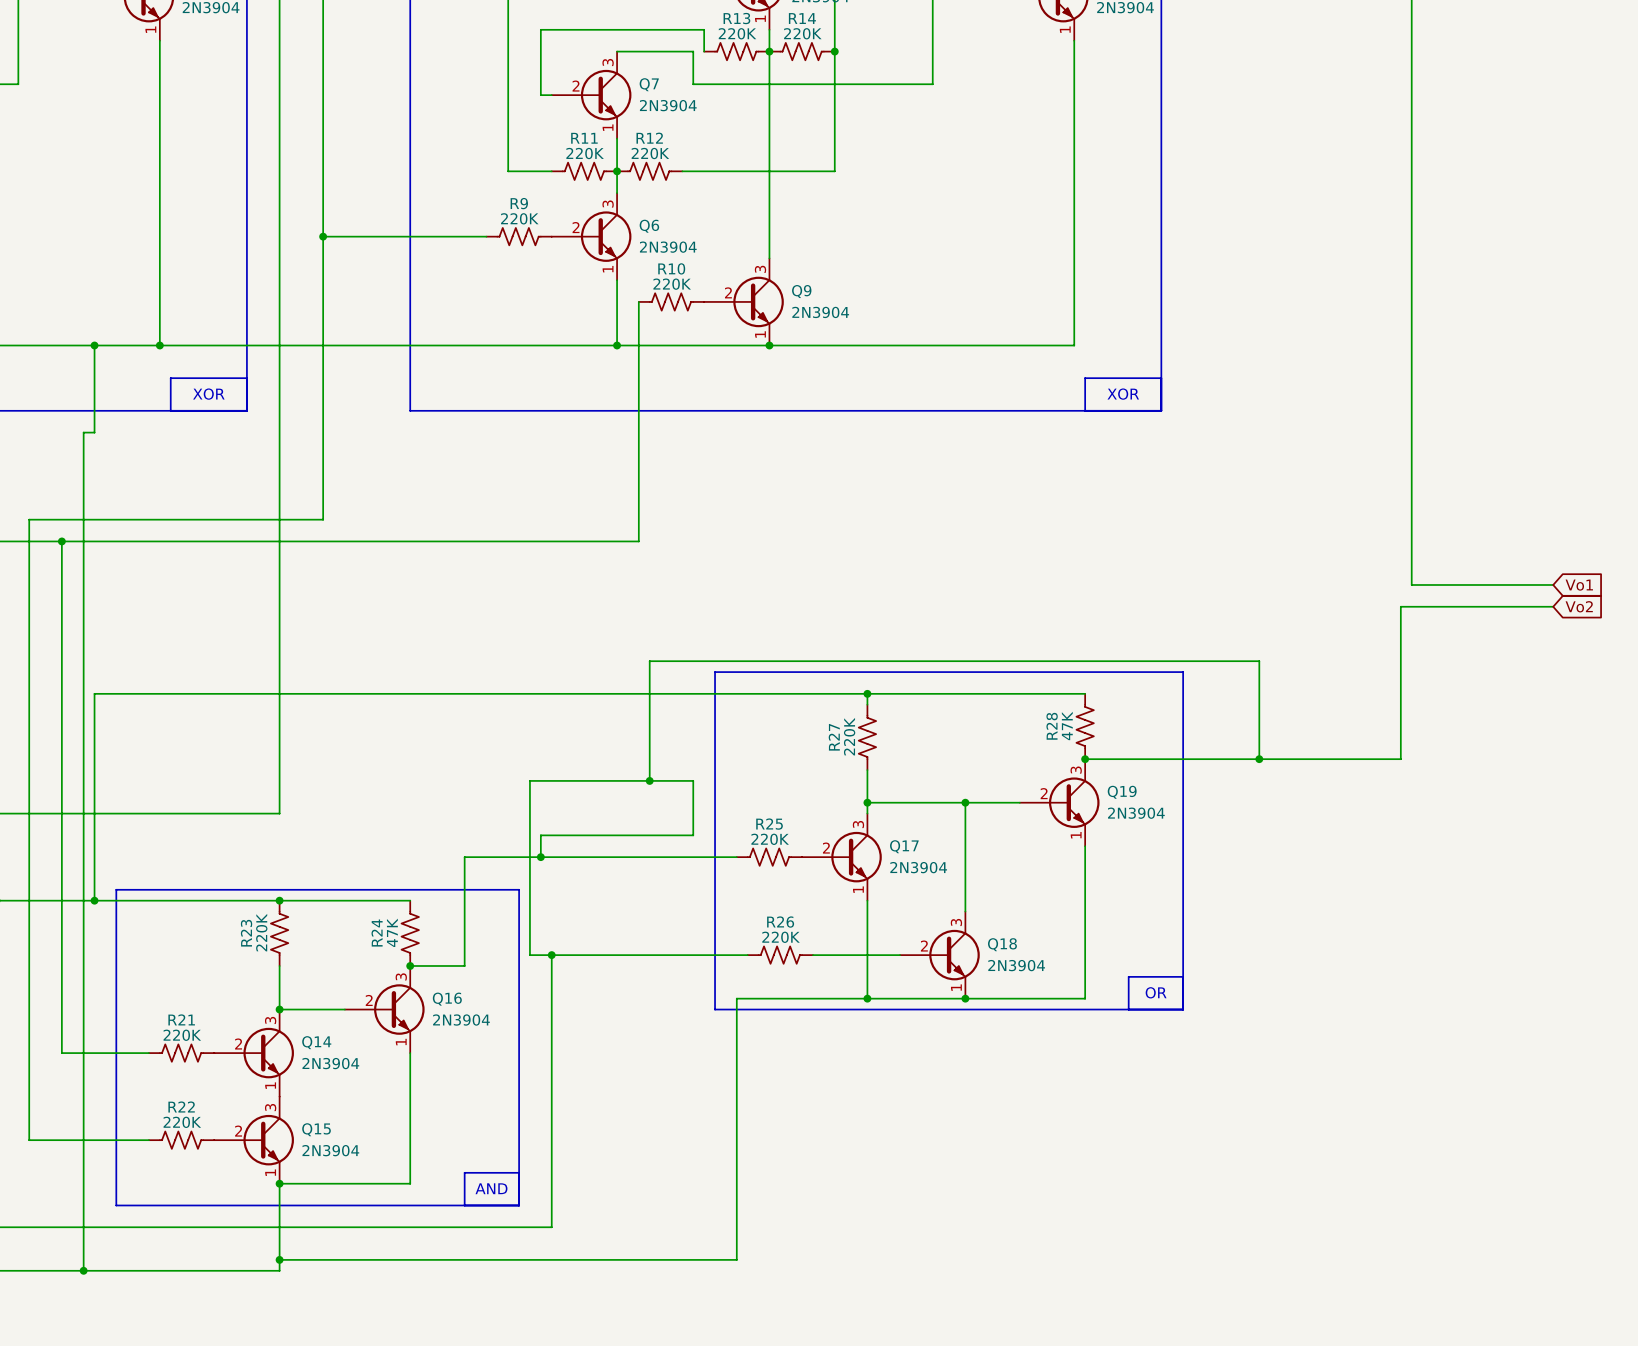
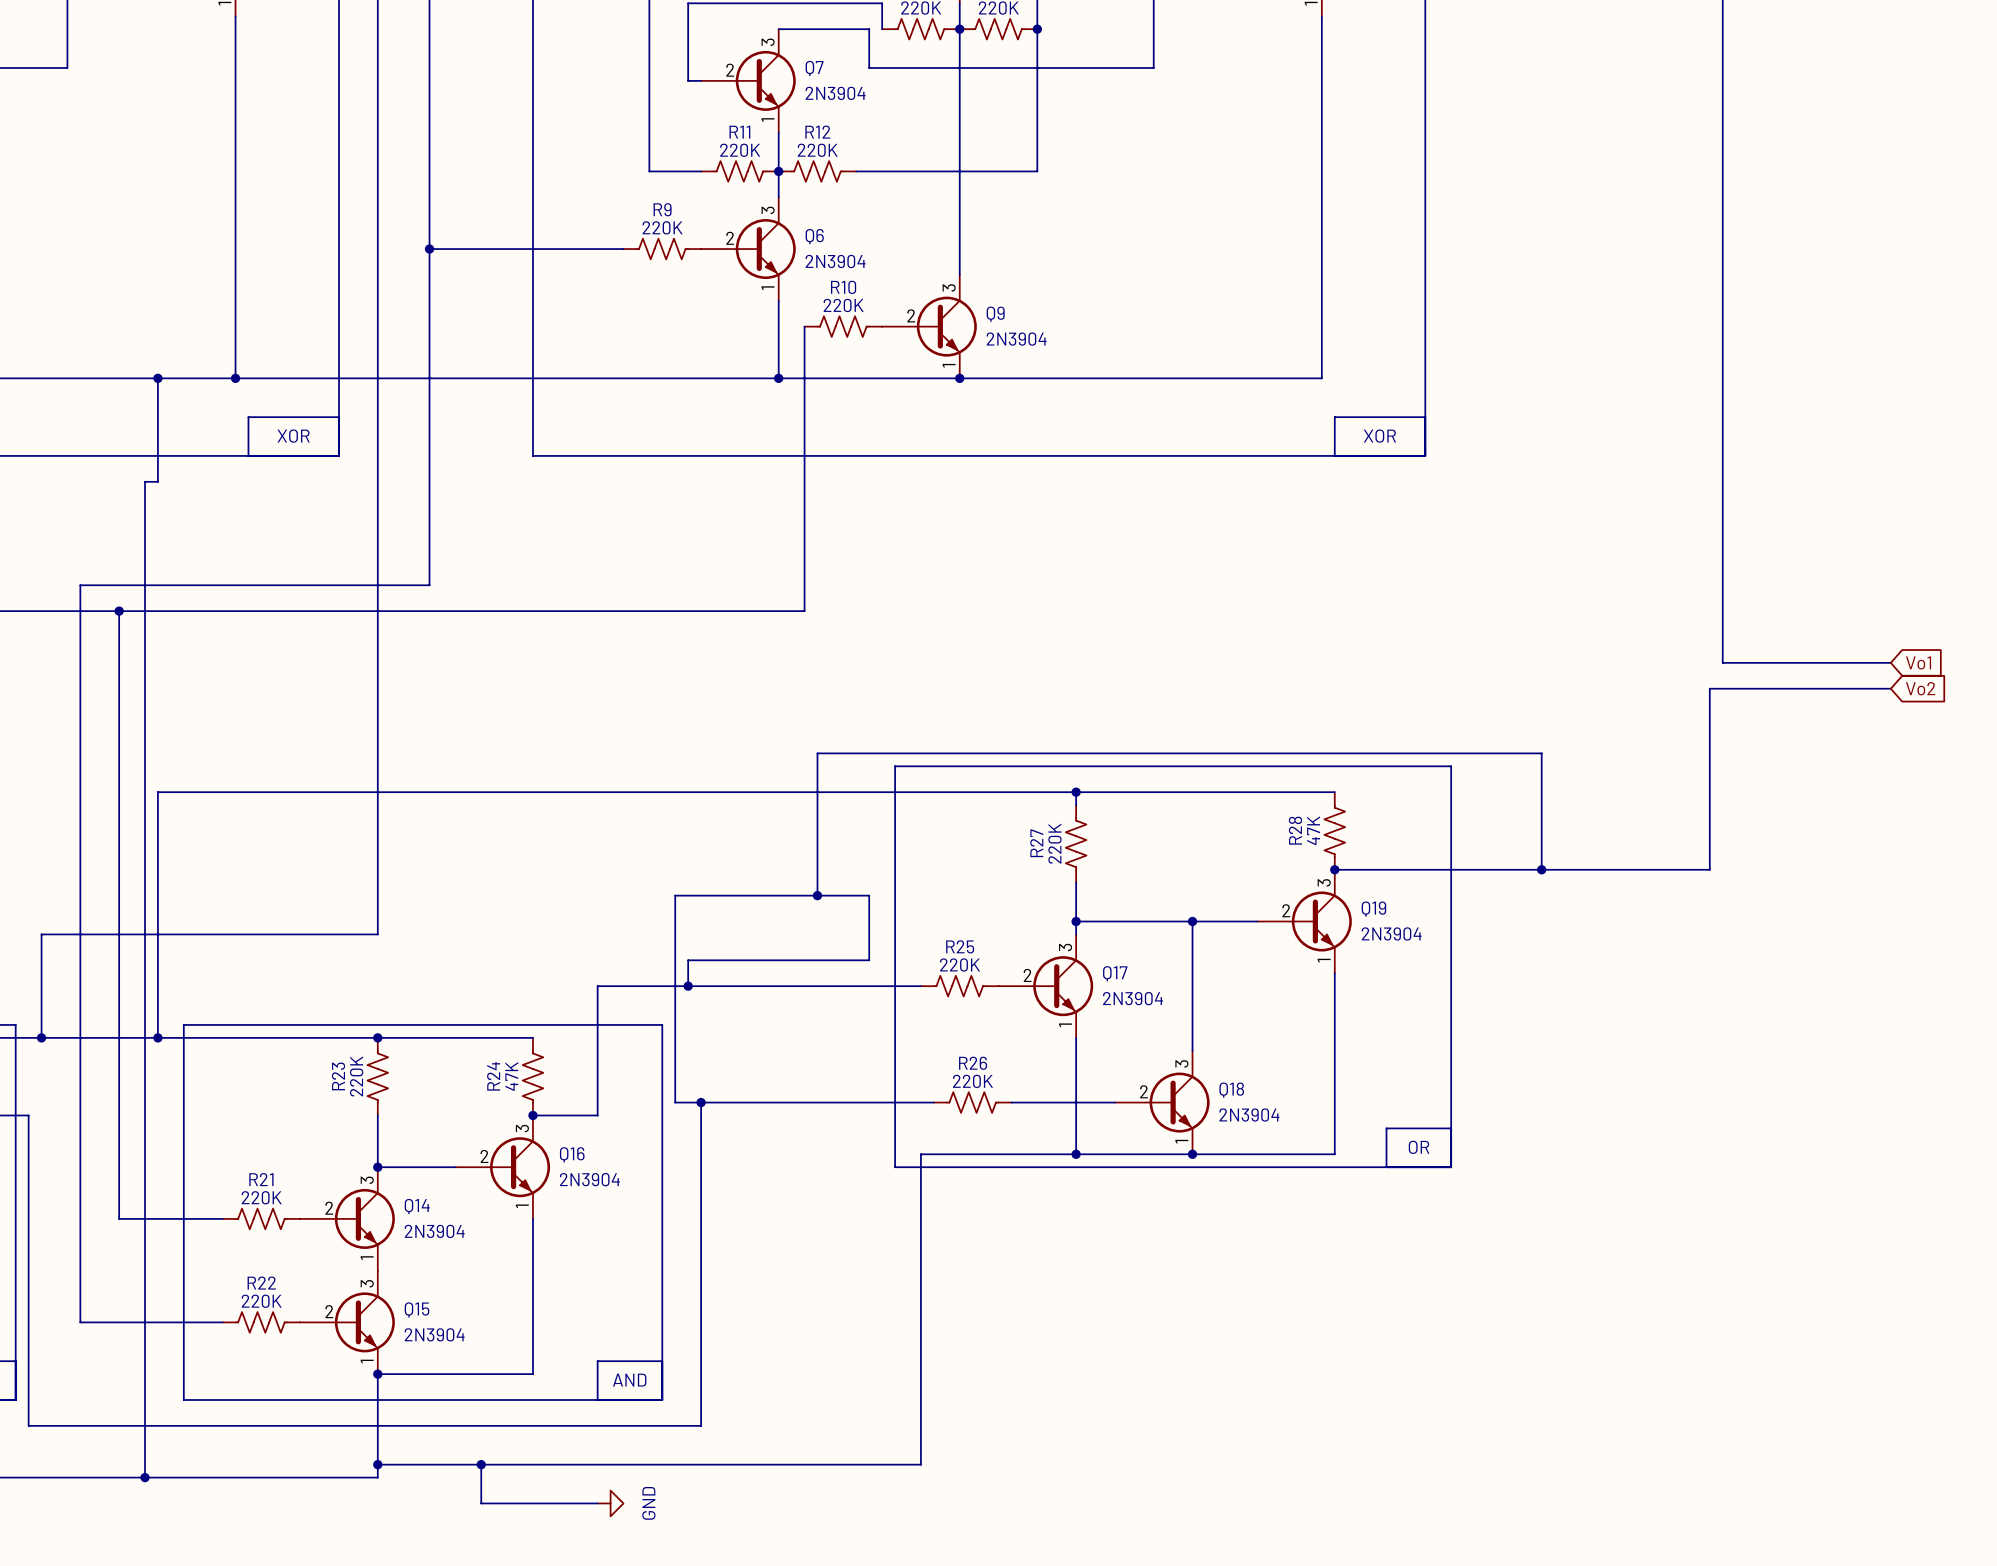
wire: none -> (481, 1464) (481, 1503) (597, 1503)
junction: none -> (481, 1464)
power symbol: none -> GND (610, 1503)

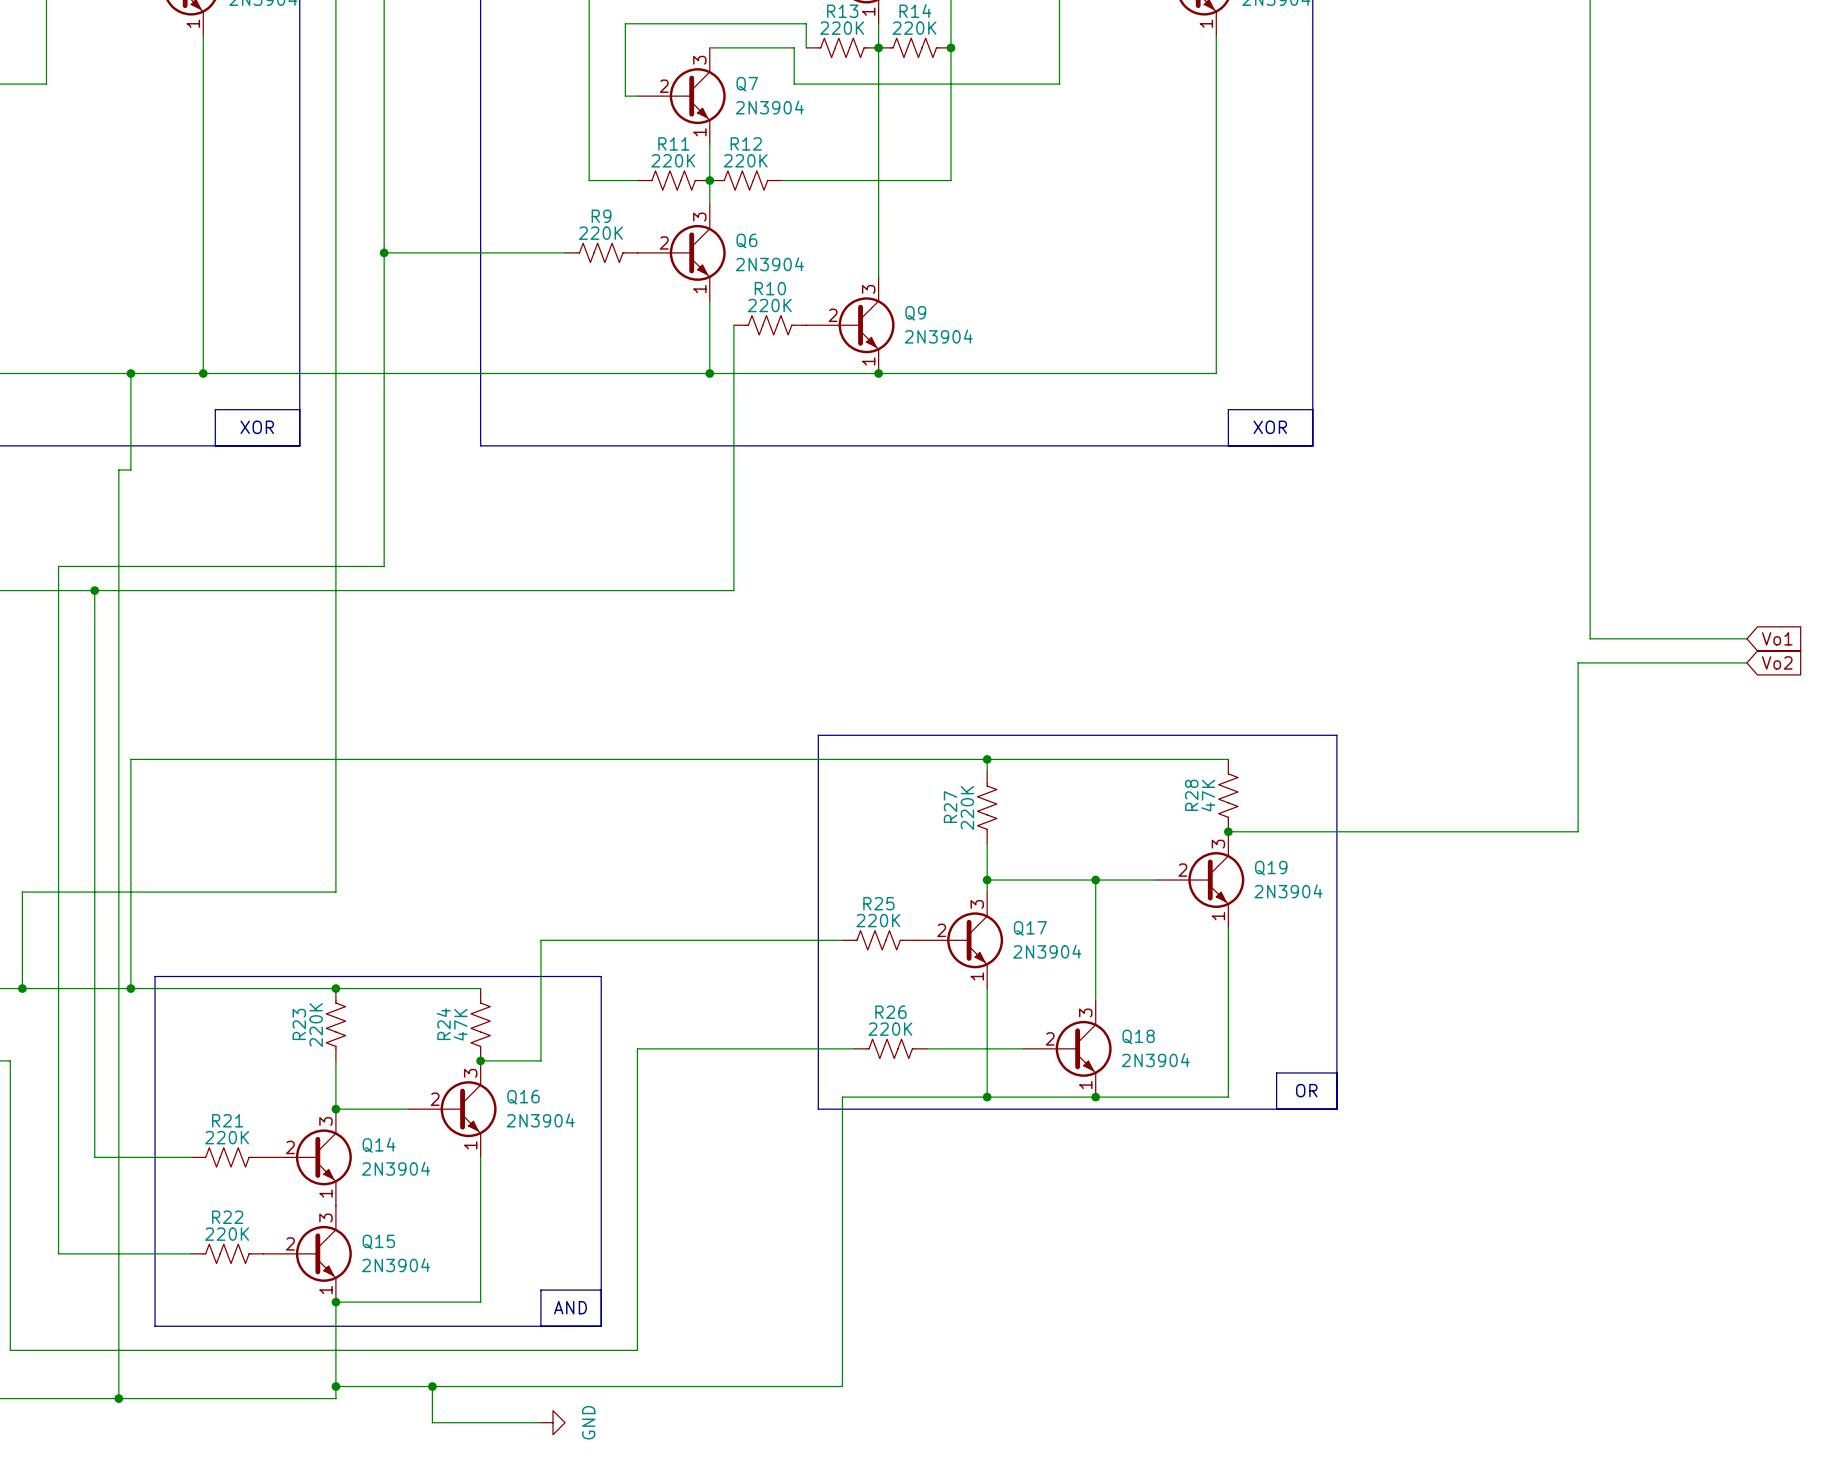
wire: (1541, 869) (1541, 753) (817, 753) (817, 895) -> none
junction: (1541, 869) -> none
junction: (817, 895) -> none
wire: (688, 986) (688, 960) (869, 960) (869, 895) (675, 895) (675, 1102) (701, 1102) -> none
junction: (688, 986) -> none
junction: (701, 1102) -> none

